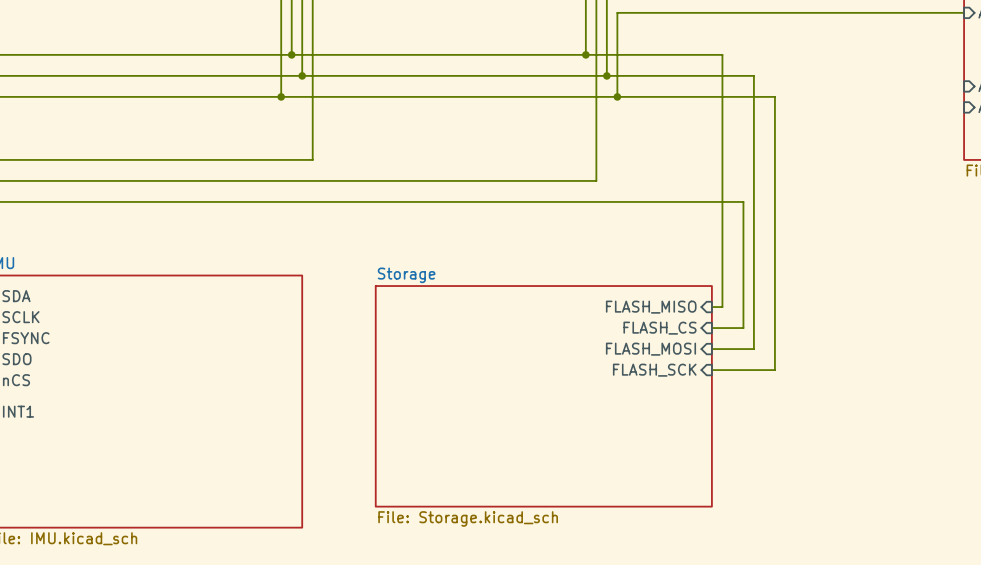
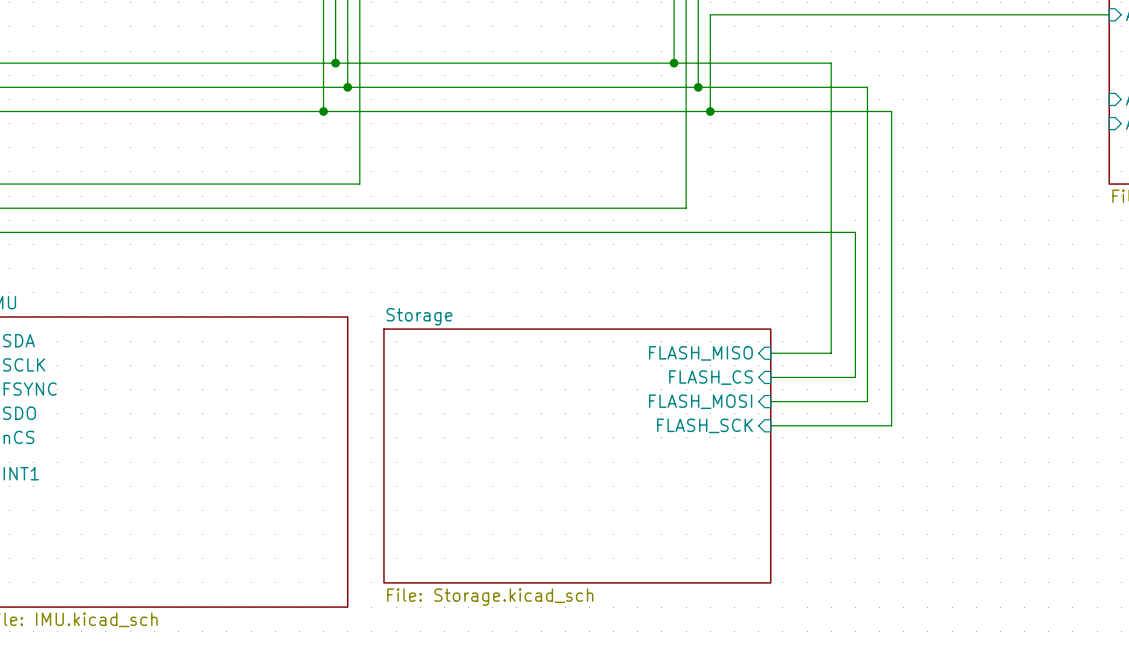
sheet pin position: FLASH_MISO (651, 307) -> FLASH_MISO (700, 353)
wire: none -> (770, 353) (819, 353)
sheet pin position: FLASH_CS (659, 328) -> FLASH_CS (711, 377)
wire: none -> (770, 377) (819, 377)
sheet pin position: FLASH_MOSI (650, 349) -> FLASH_MOSI (700, 401)
wire: none -> (770, 401) (819, 401)
sheet pin position: FLASH_SCK (654, 370) -> FLASH_SCK (704, 425)
wire: none -> (770, 425) (819, 425)
sheet Storage position: (543, 396) -> (577, 456)

